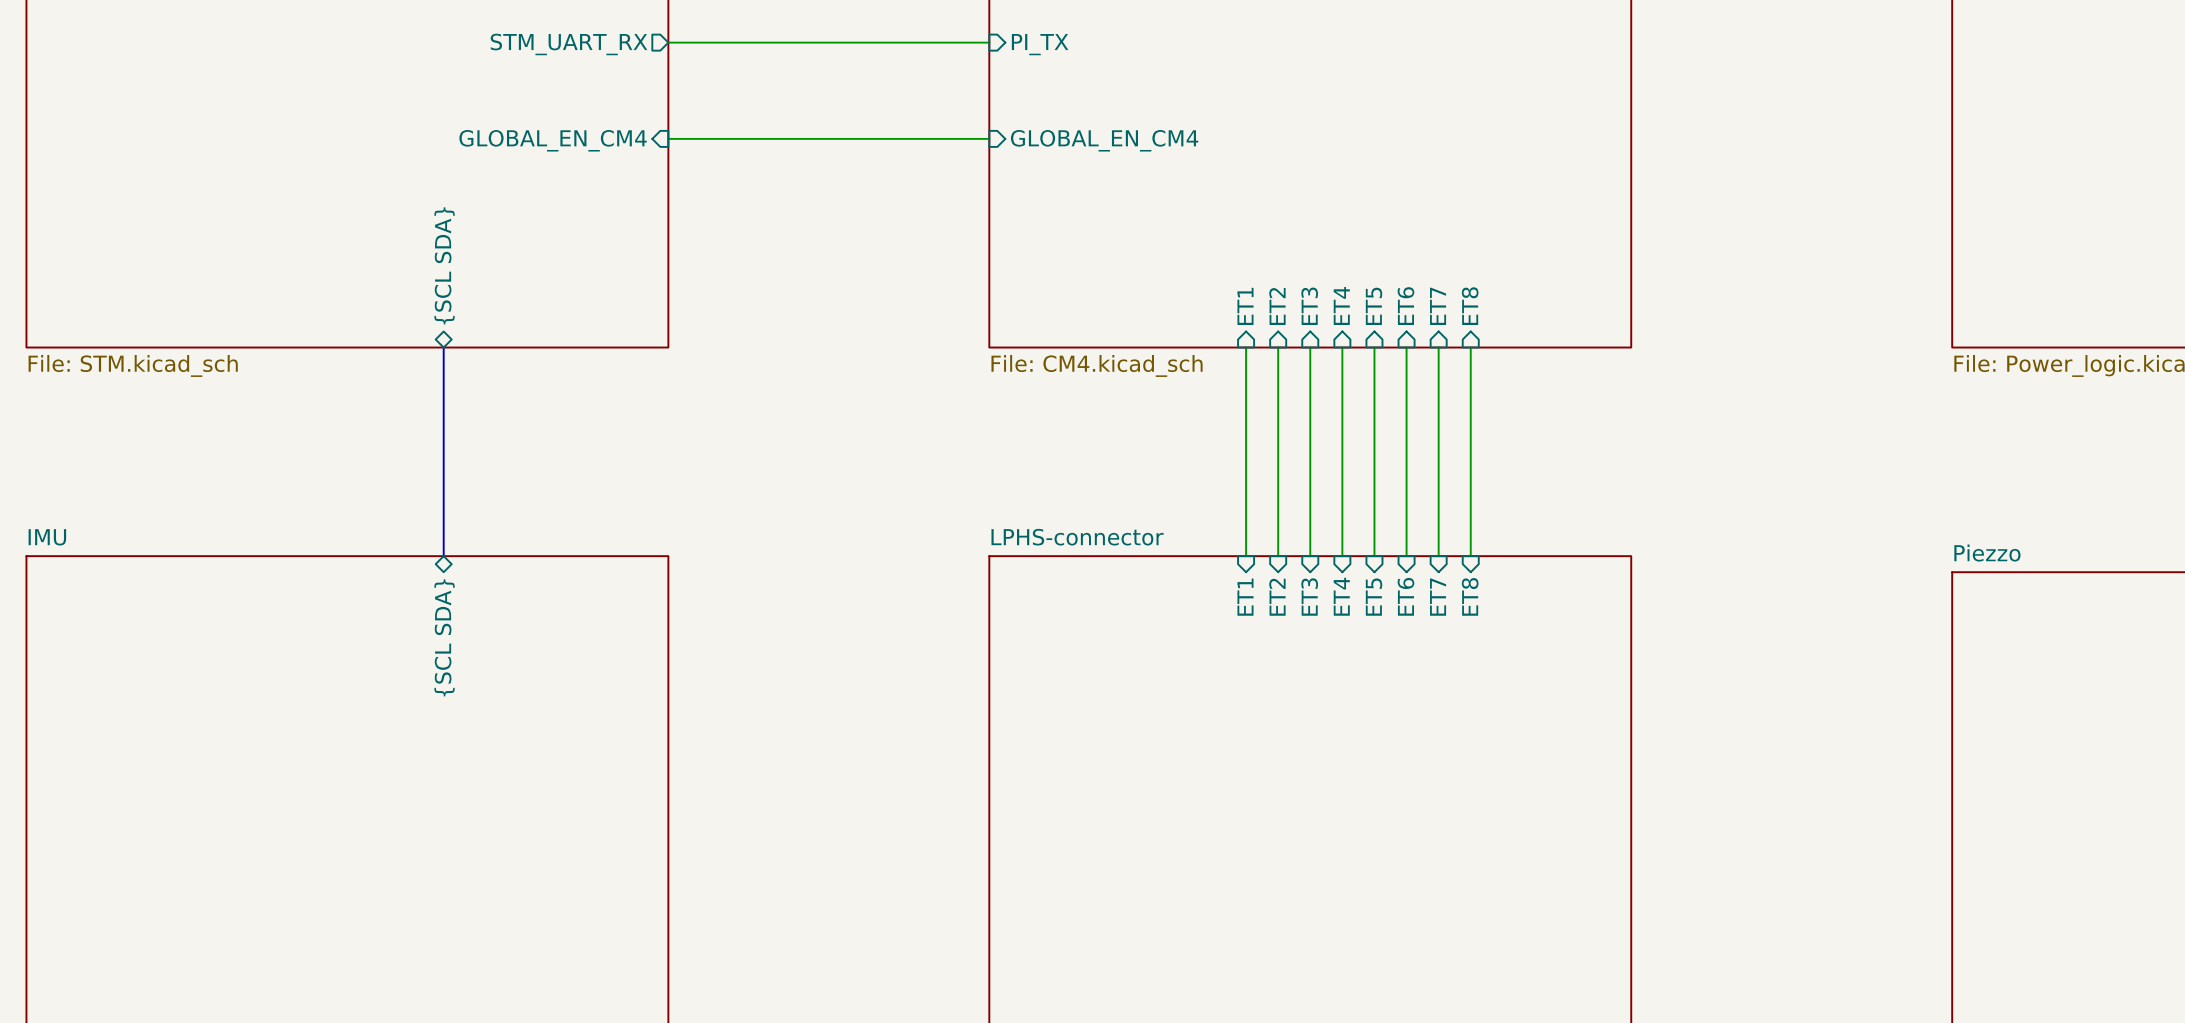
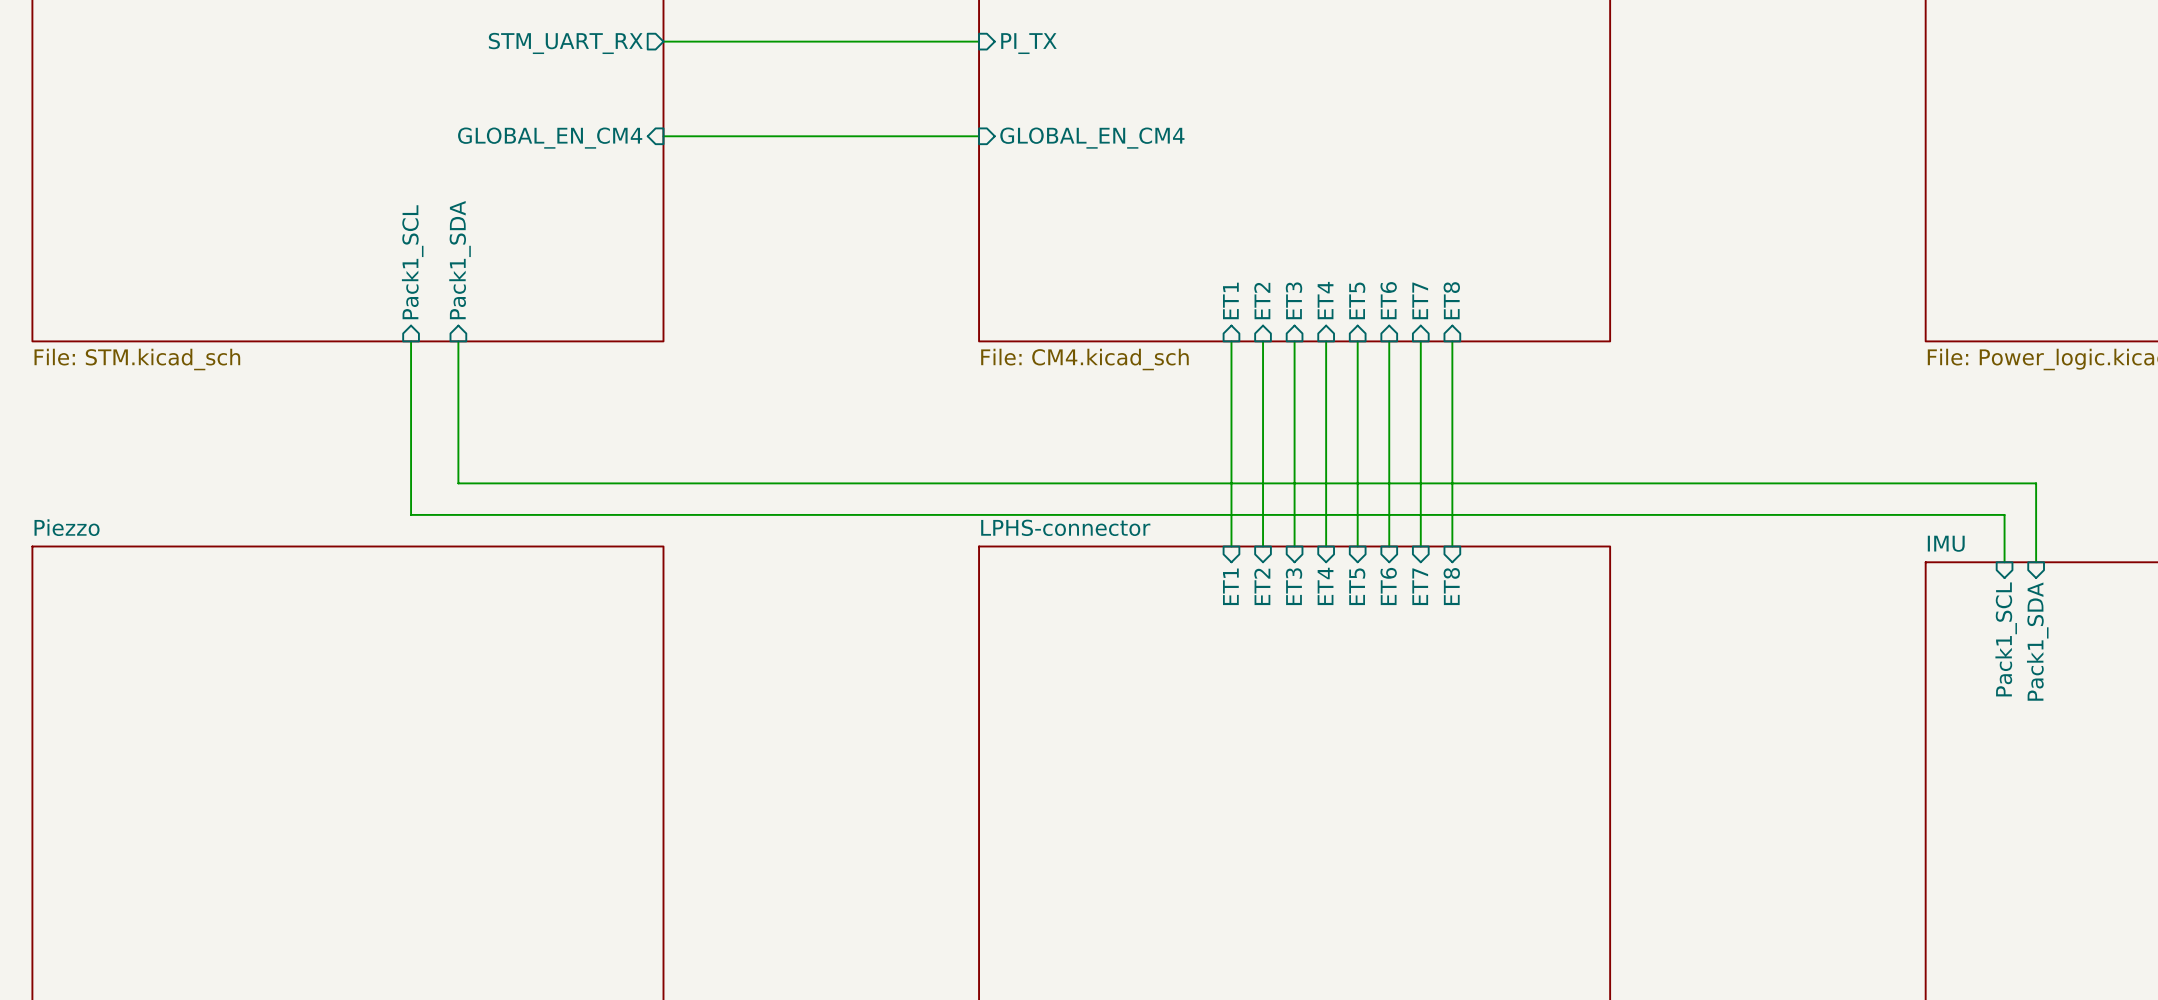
sheet pin: none -> Pack1_SDA (460, 260)
sheet pin: {SCL SDA} (444, 265) -> none
sheet pin: none -> Pack1_SCL (412, 262)
wire: none -> (411, 341) (411, 514) (2004, 514) (2004, 562)
bus: (443, 347) (443, 556) -> none
wire: none -> (458, 341) (458, 483) (2036, 483) (2036, 562)
sheet IMU name: IMU (47, 537) -> Piezzo (67, 527)
sheet Piezzo name: Piezzo (1987, 553) -> IMU (1946, 543)
sheet pin: {SCL SDA} (444, 637) -> none
sheet pin: none -> Pack1_SCL (2006, 639)
sheet pin: none -> Pack1_SDA (2037, 641)

